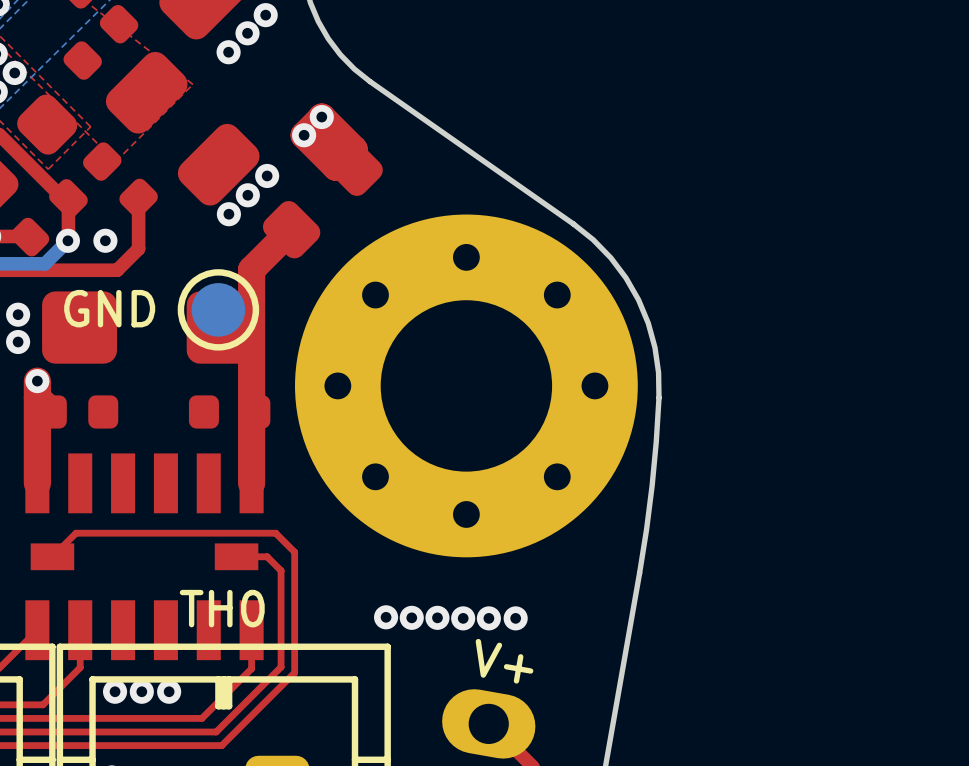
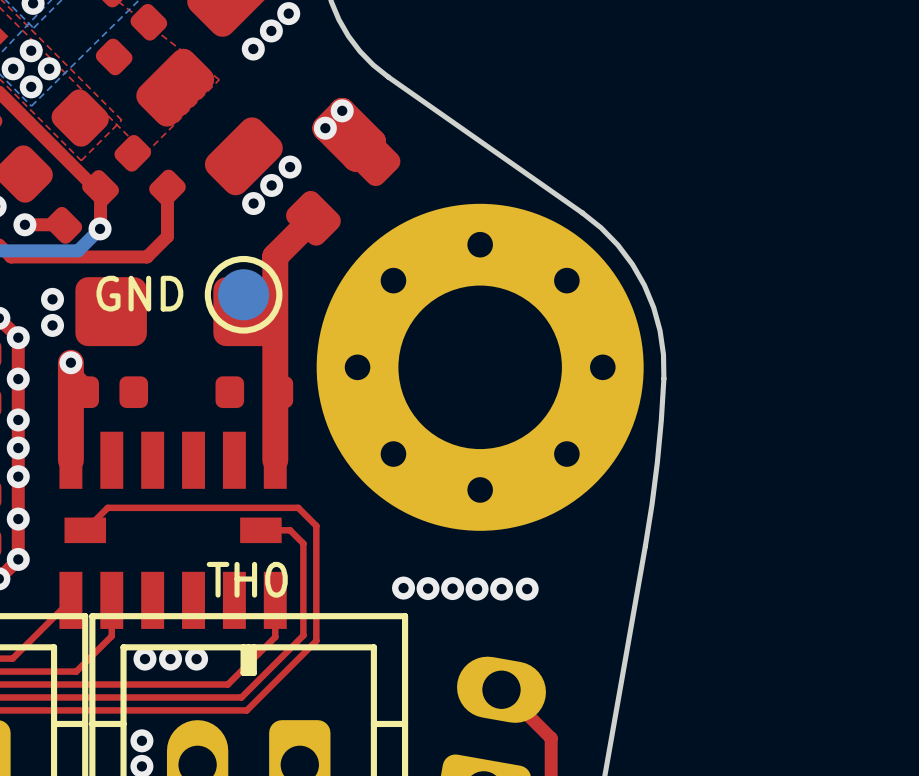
via: (105, 240) -> none
text: V+ (504, 661) -> none

